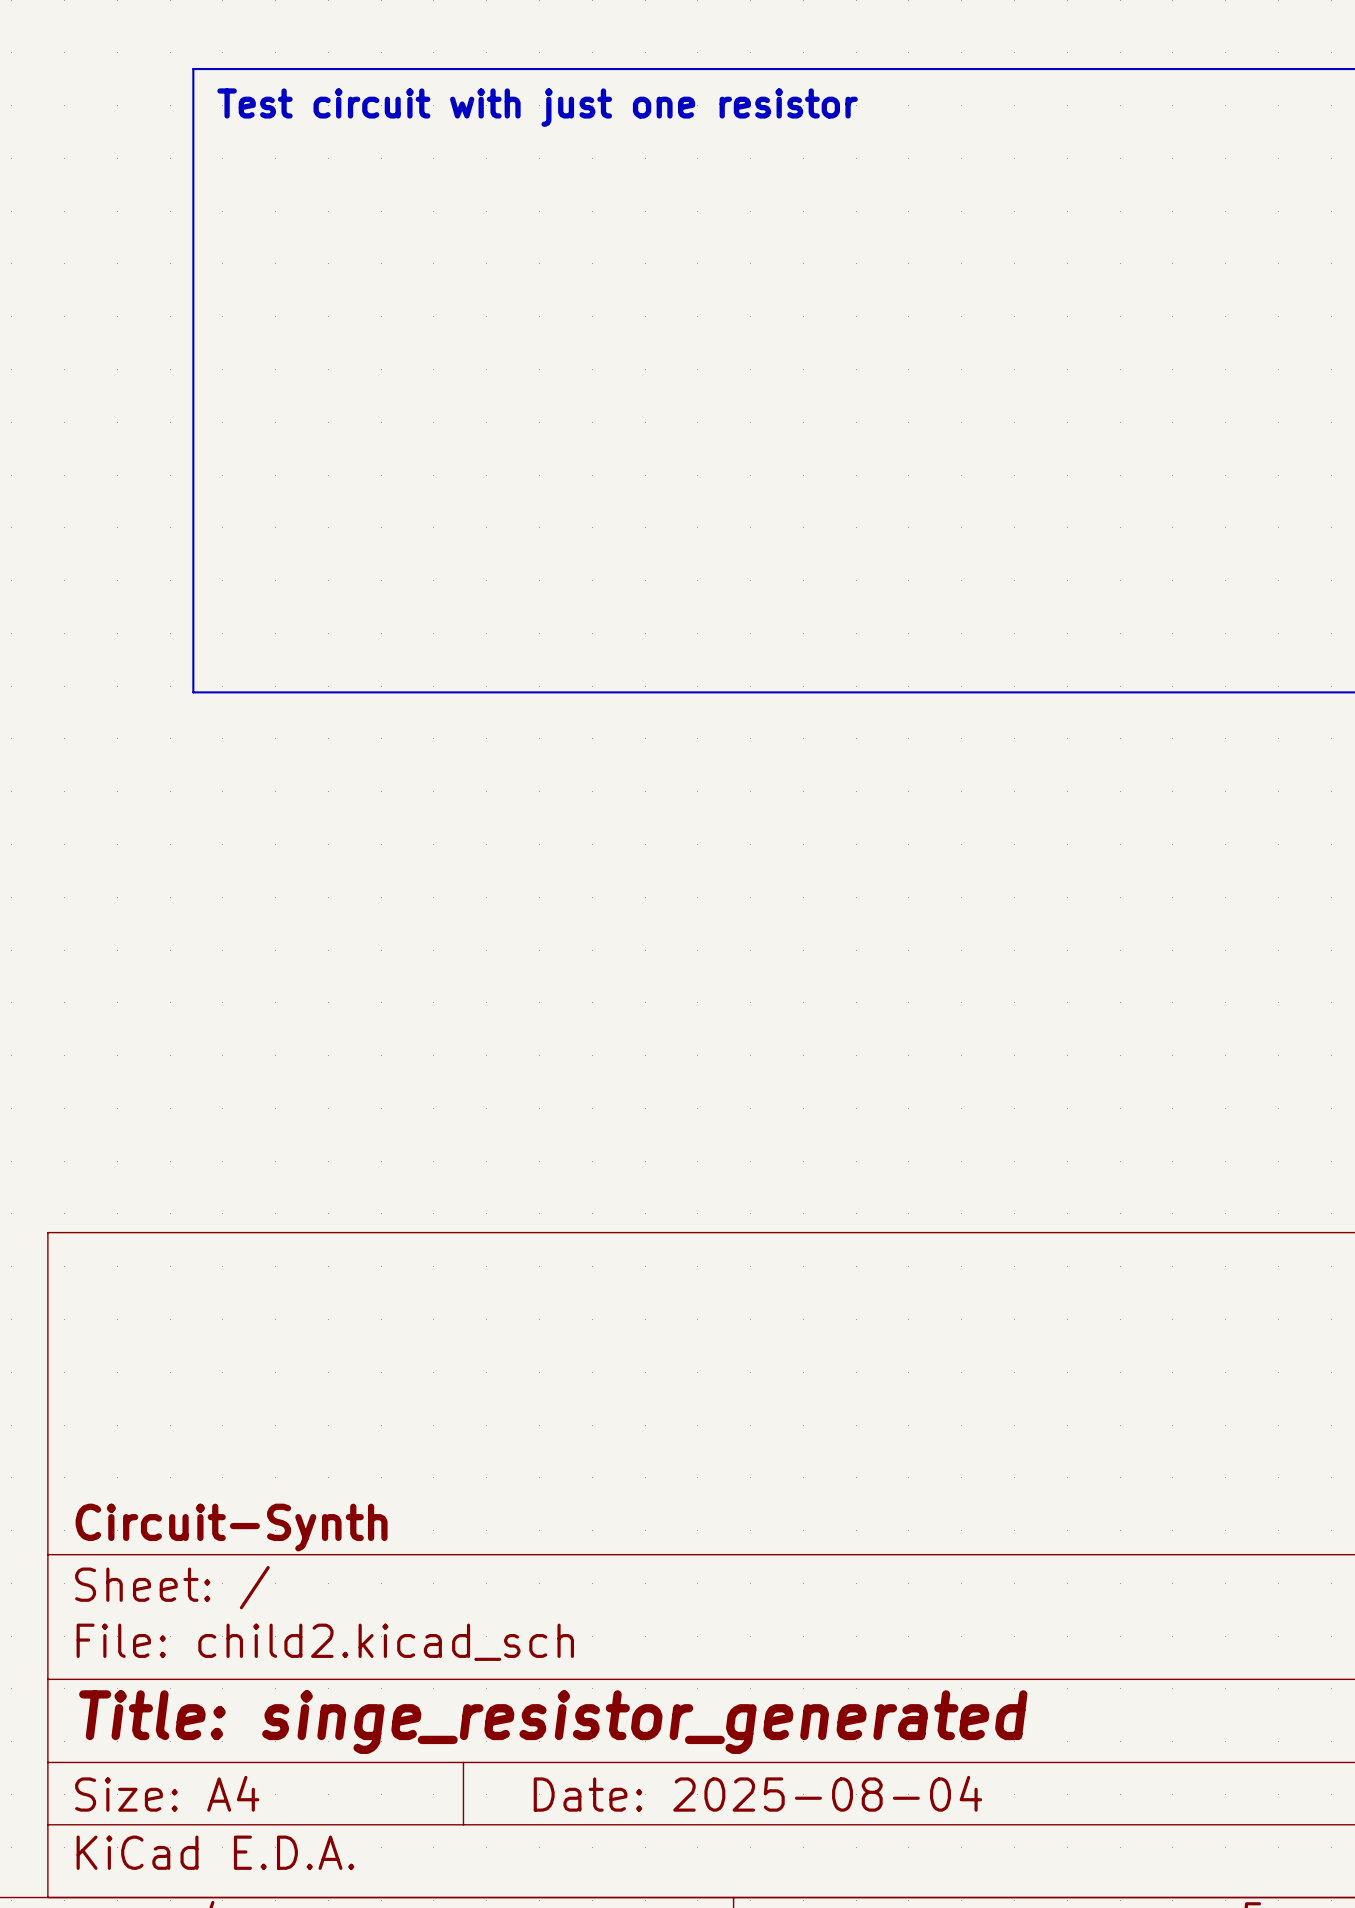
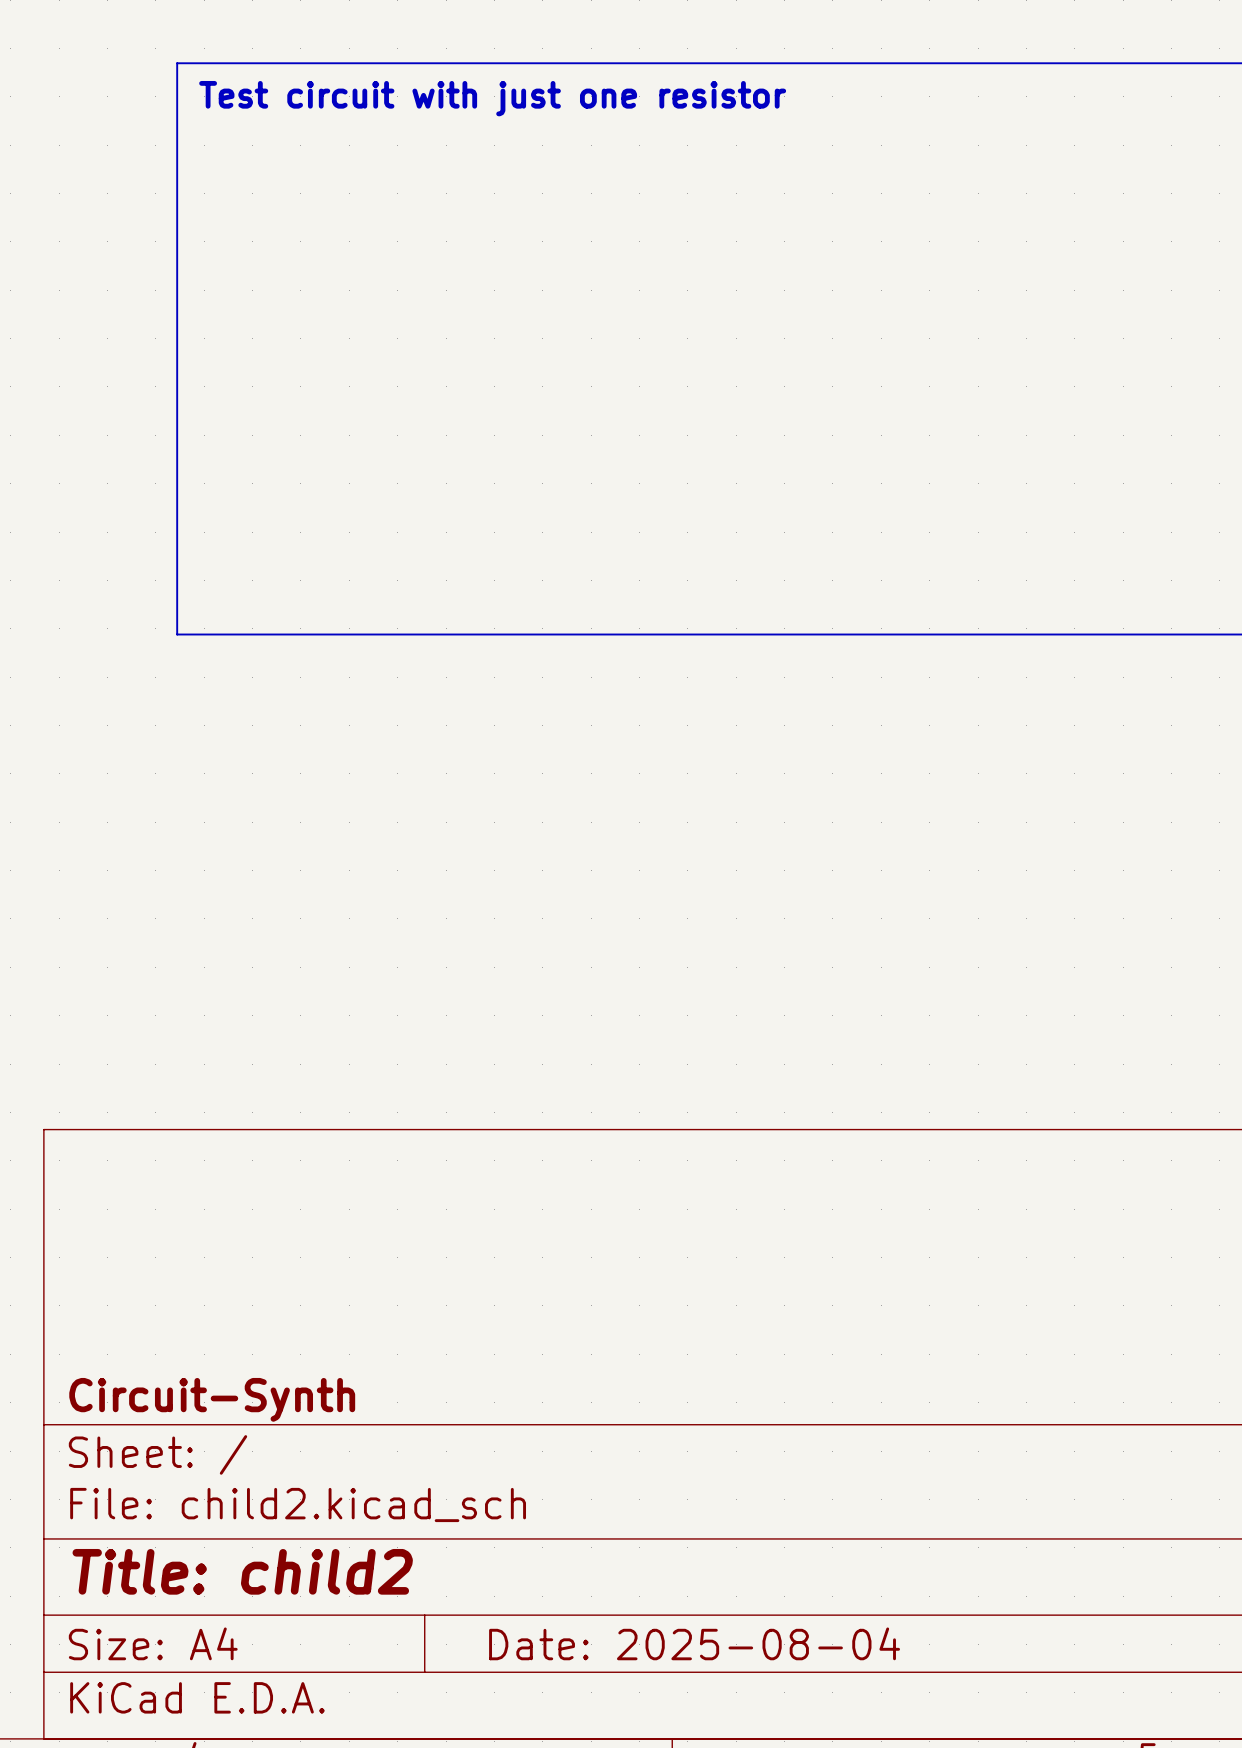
title block: Title: singe_resistor_generated (553, 1722) -> Title: child2 (242, 1571)

